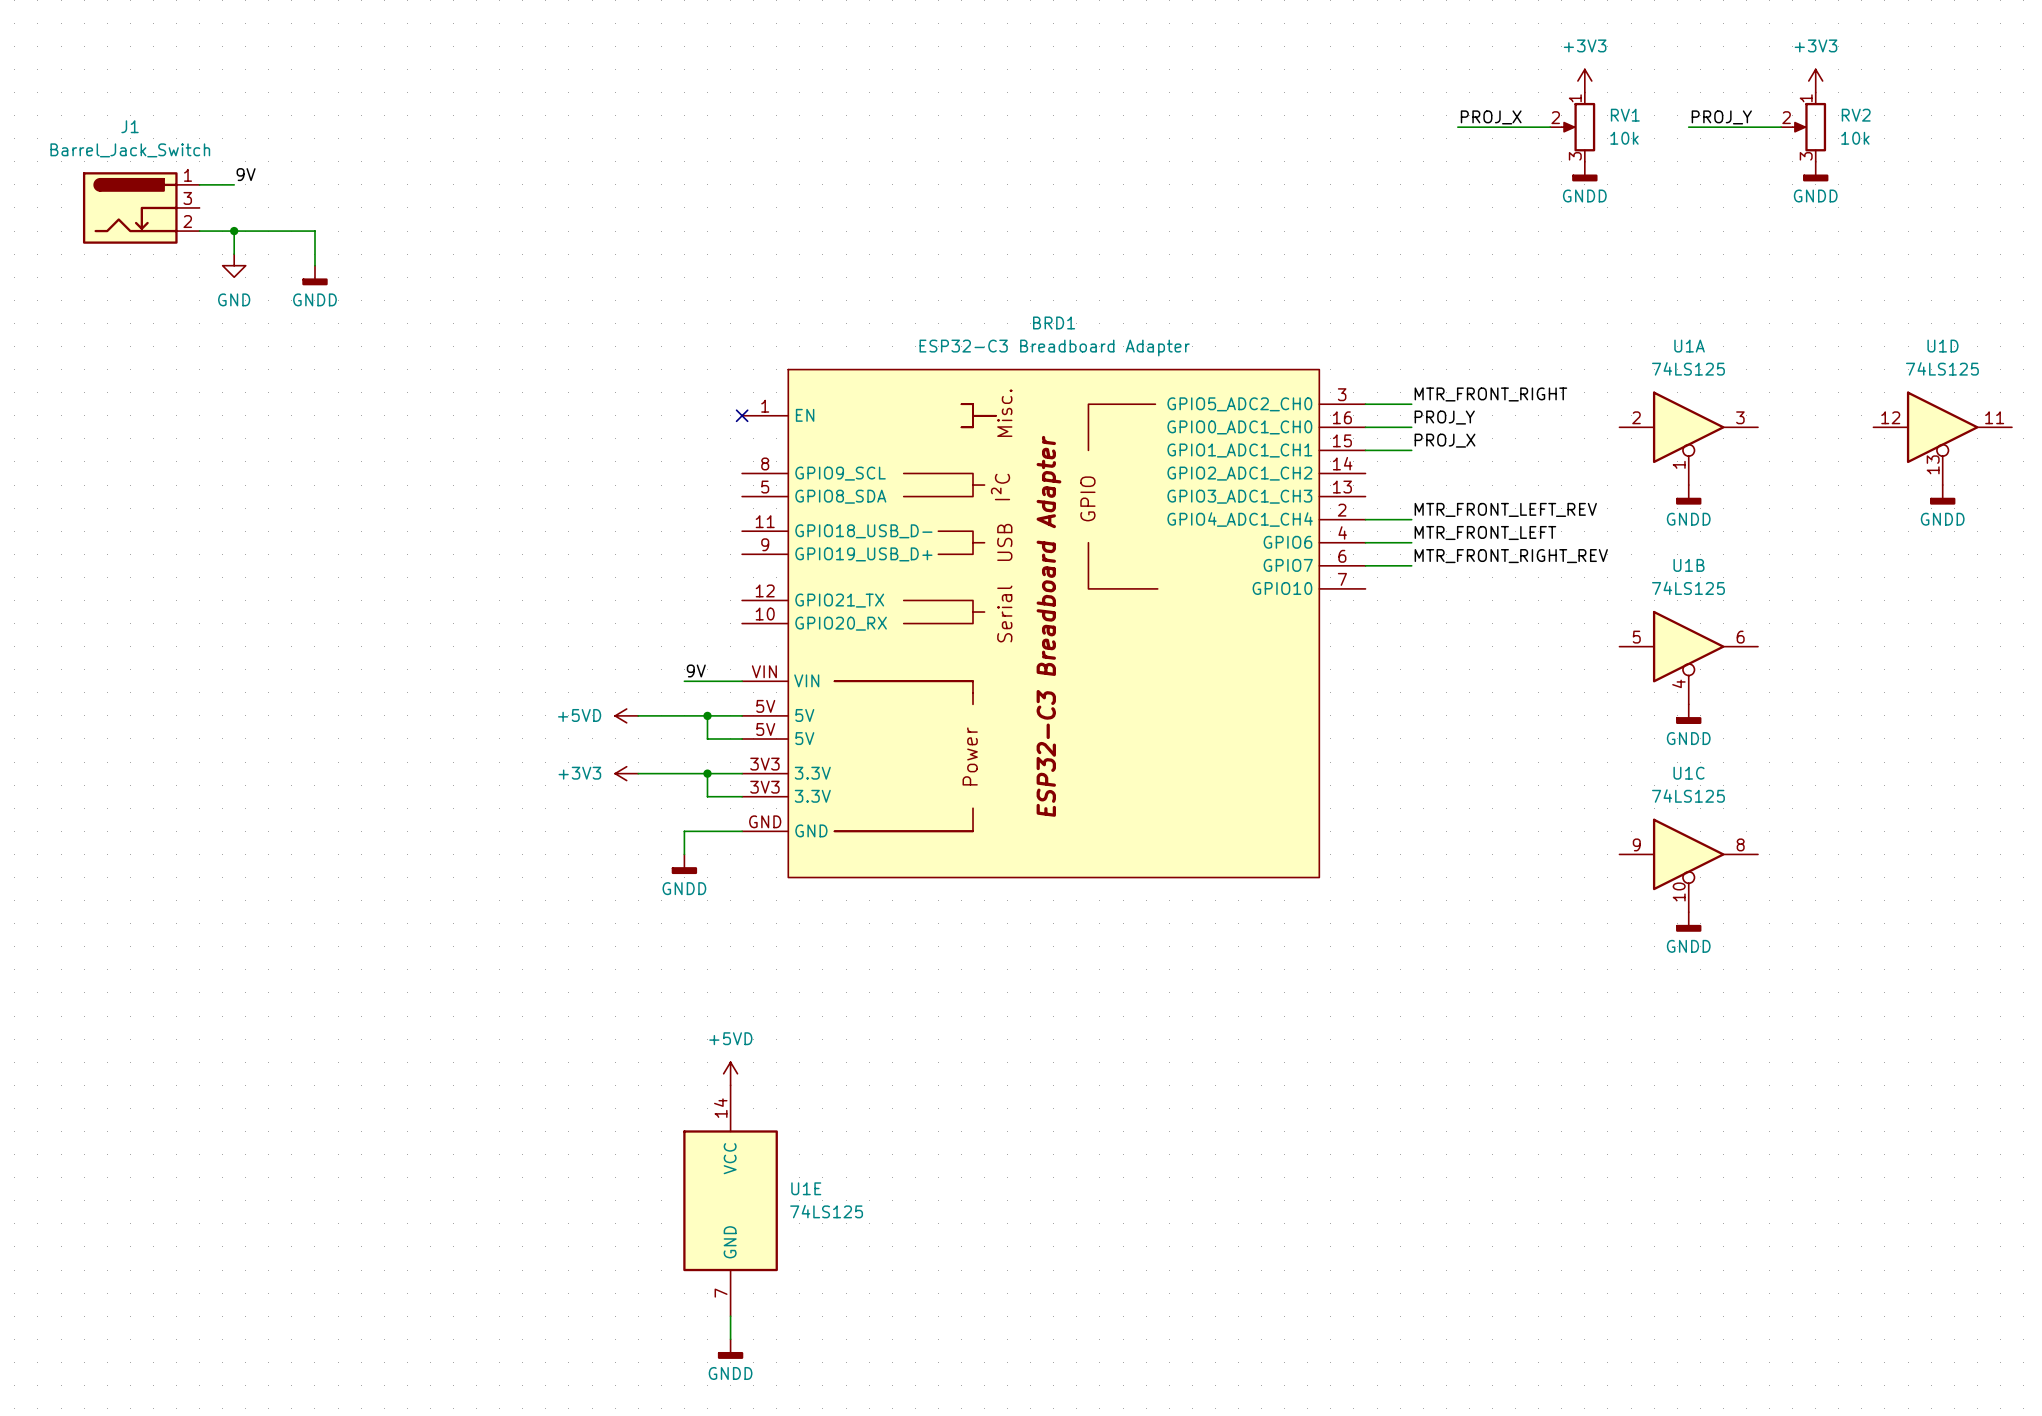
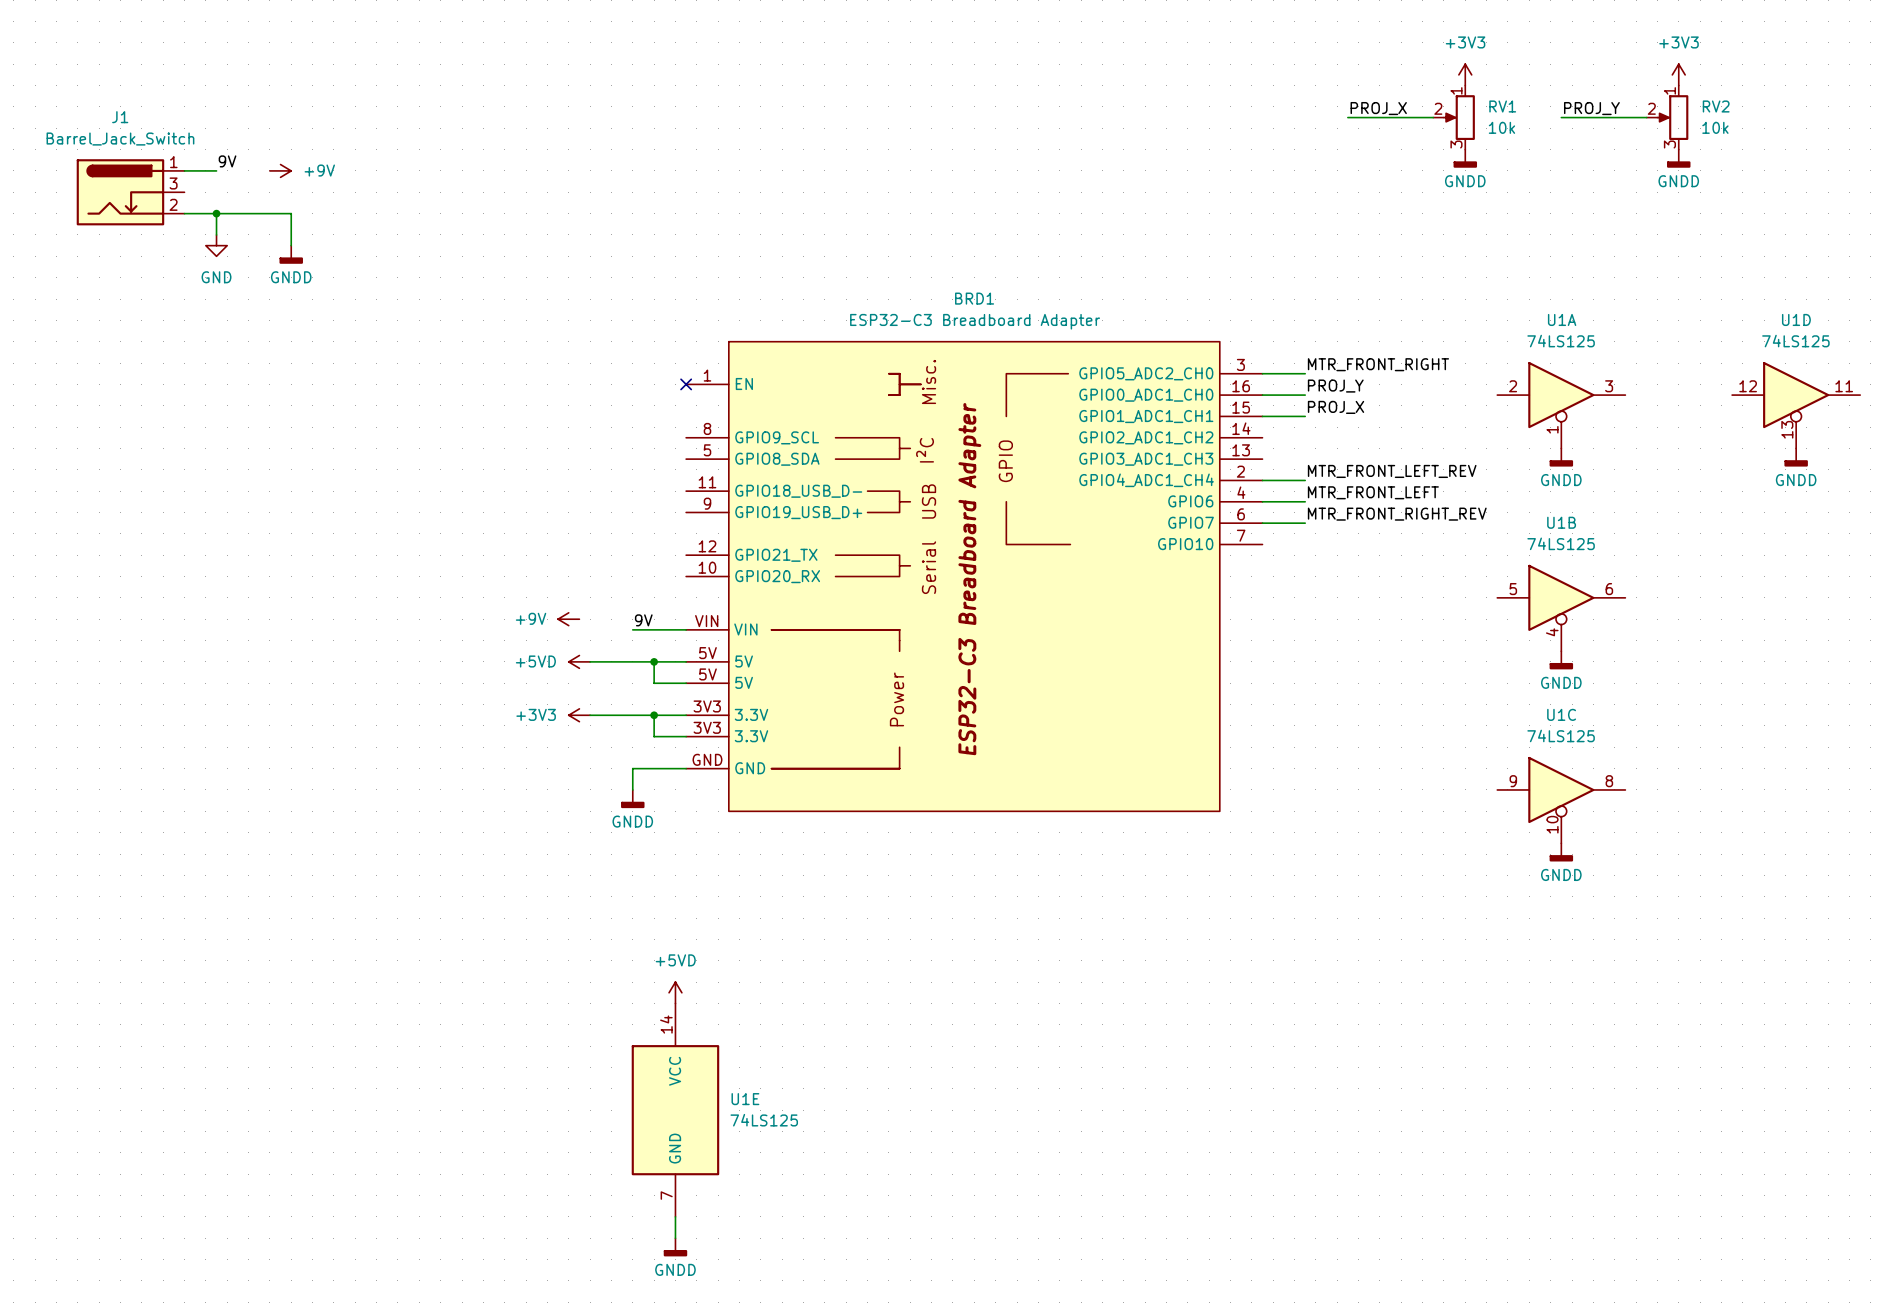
power symbol: none -> +9V (280, 170)
power symbol: none -> +9V (568, 619)

